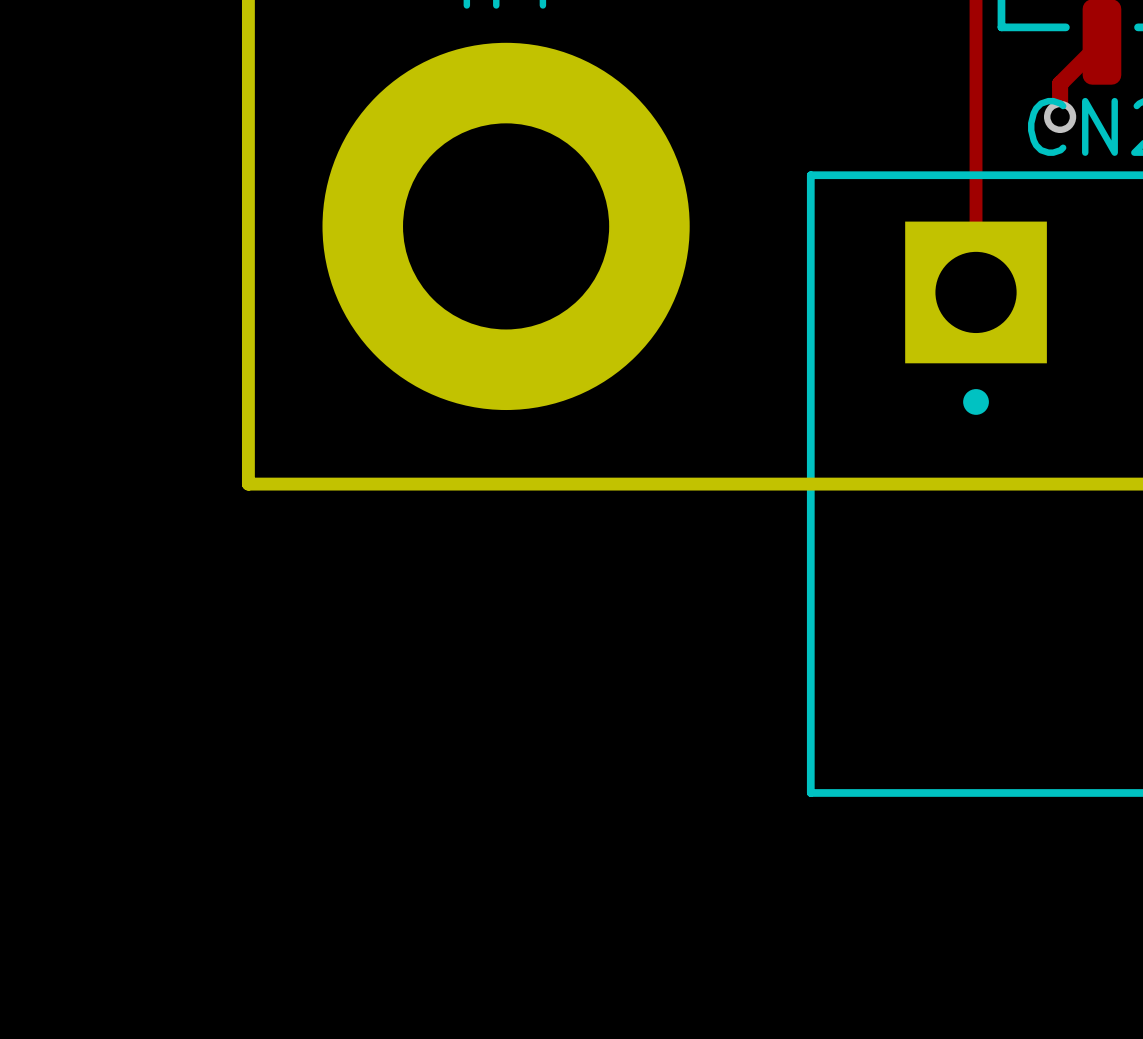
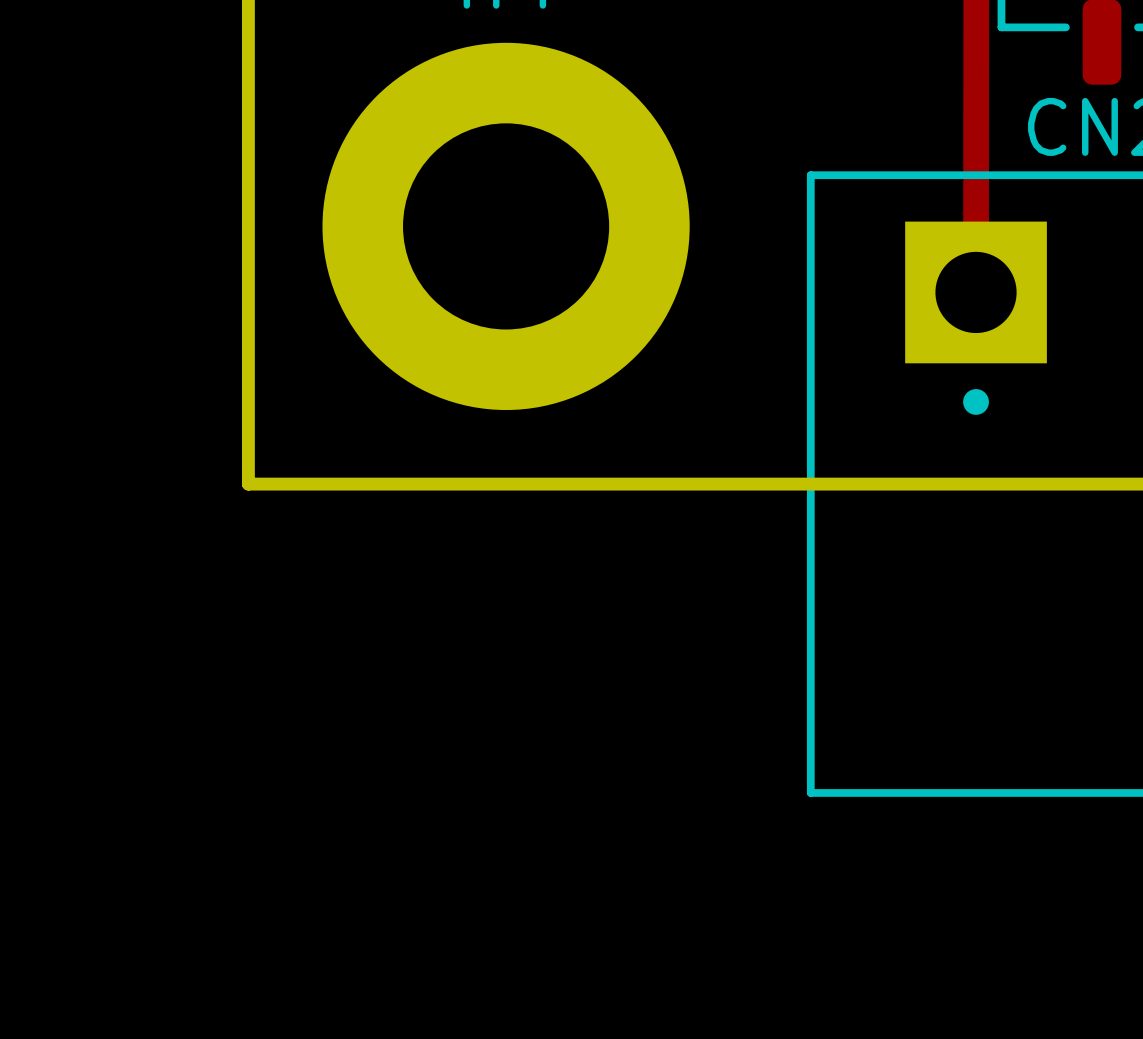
track: (1101, 42) (1060, 83) (1060, 116) -> none
via: (1060, 116) -> none

